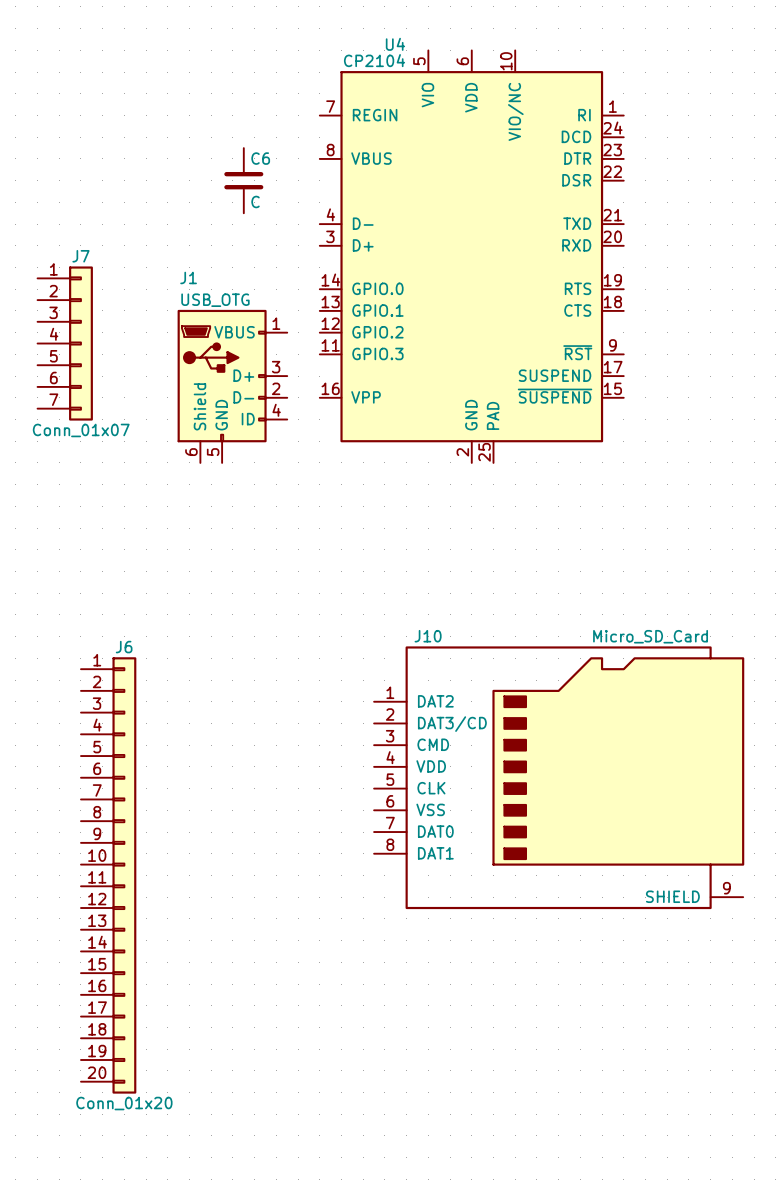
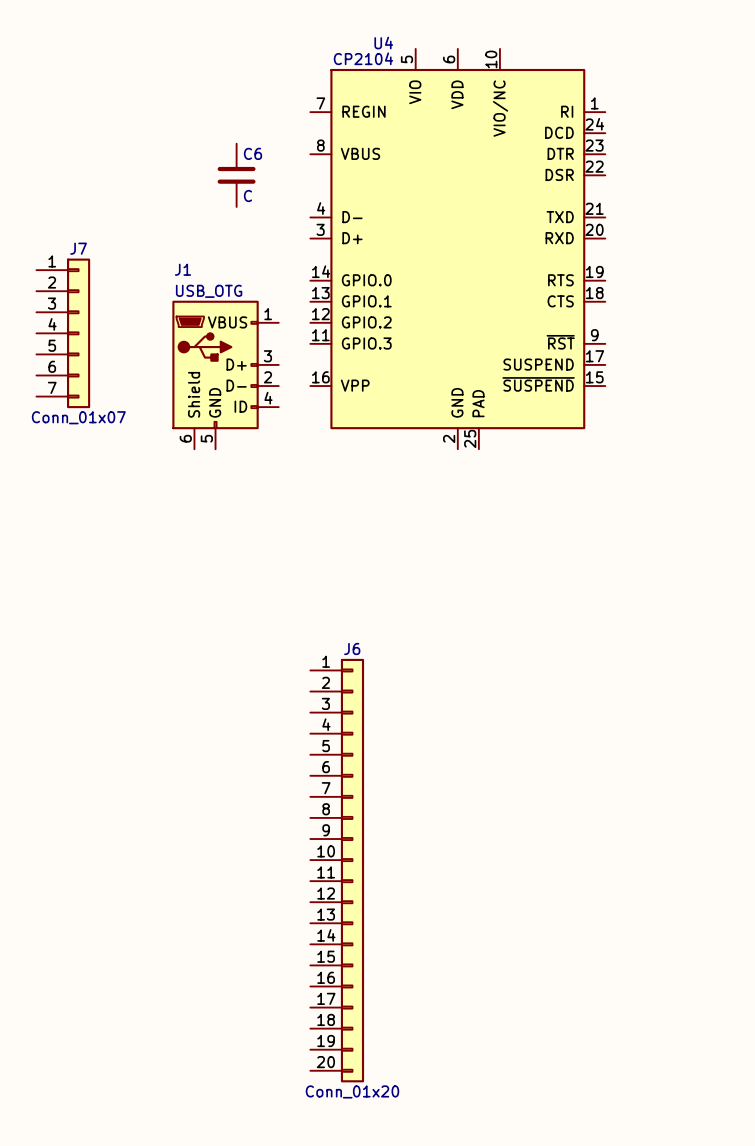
J10: Micro_SD_Card (559, 777) -> none
J6 position: (108, 875) -> (337, 870)

